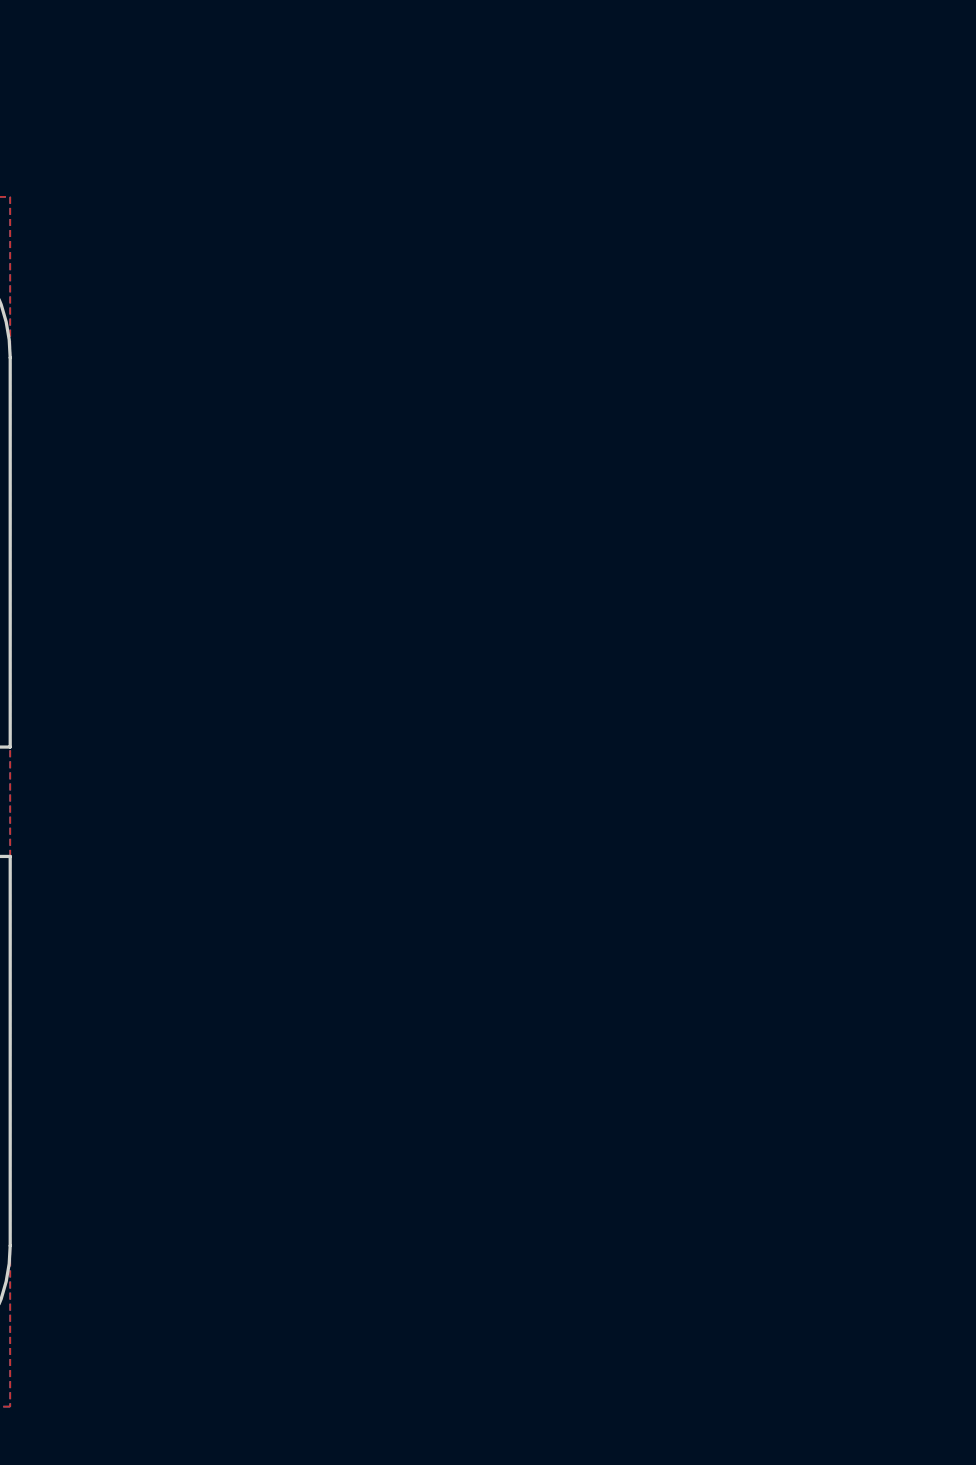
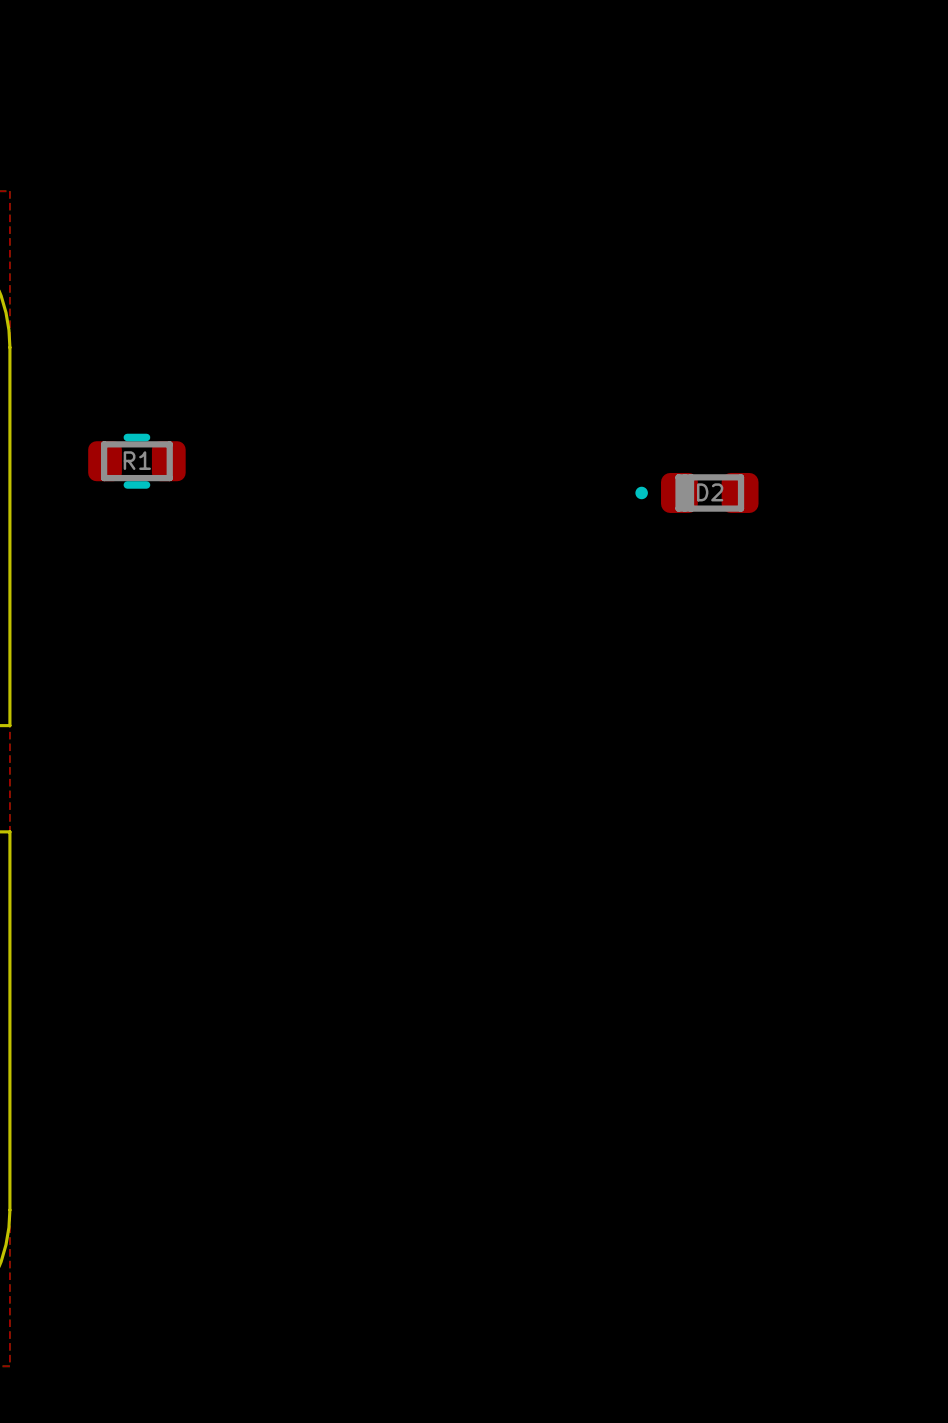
R1: none -> (136, 461)
D2: none -> (696, 492)

